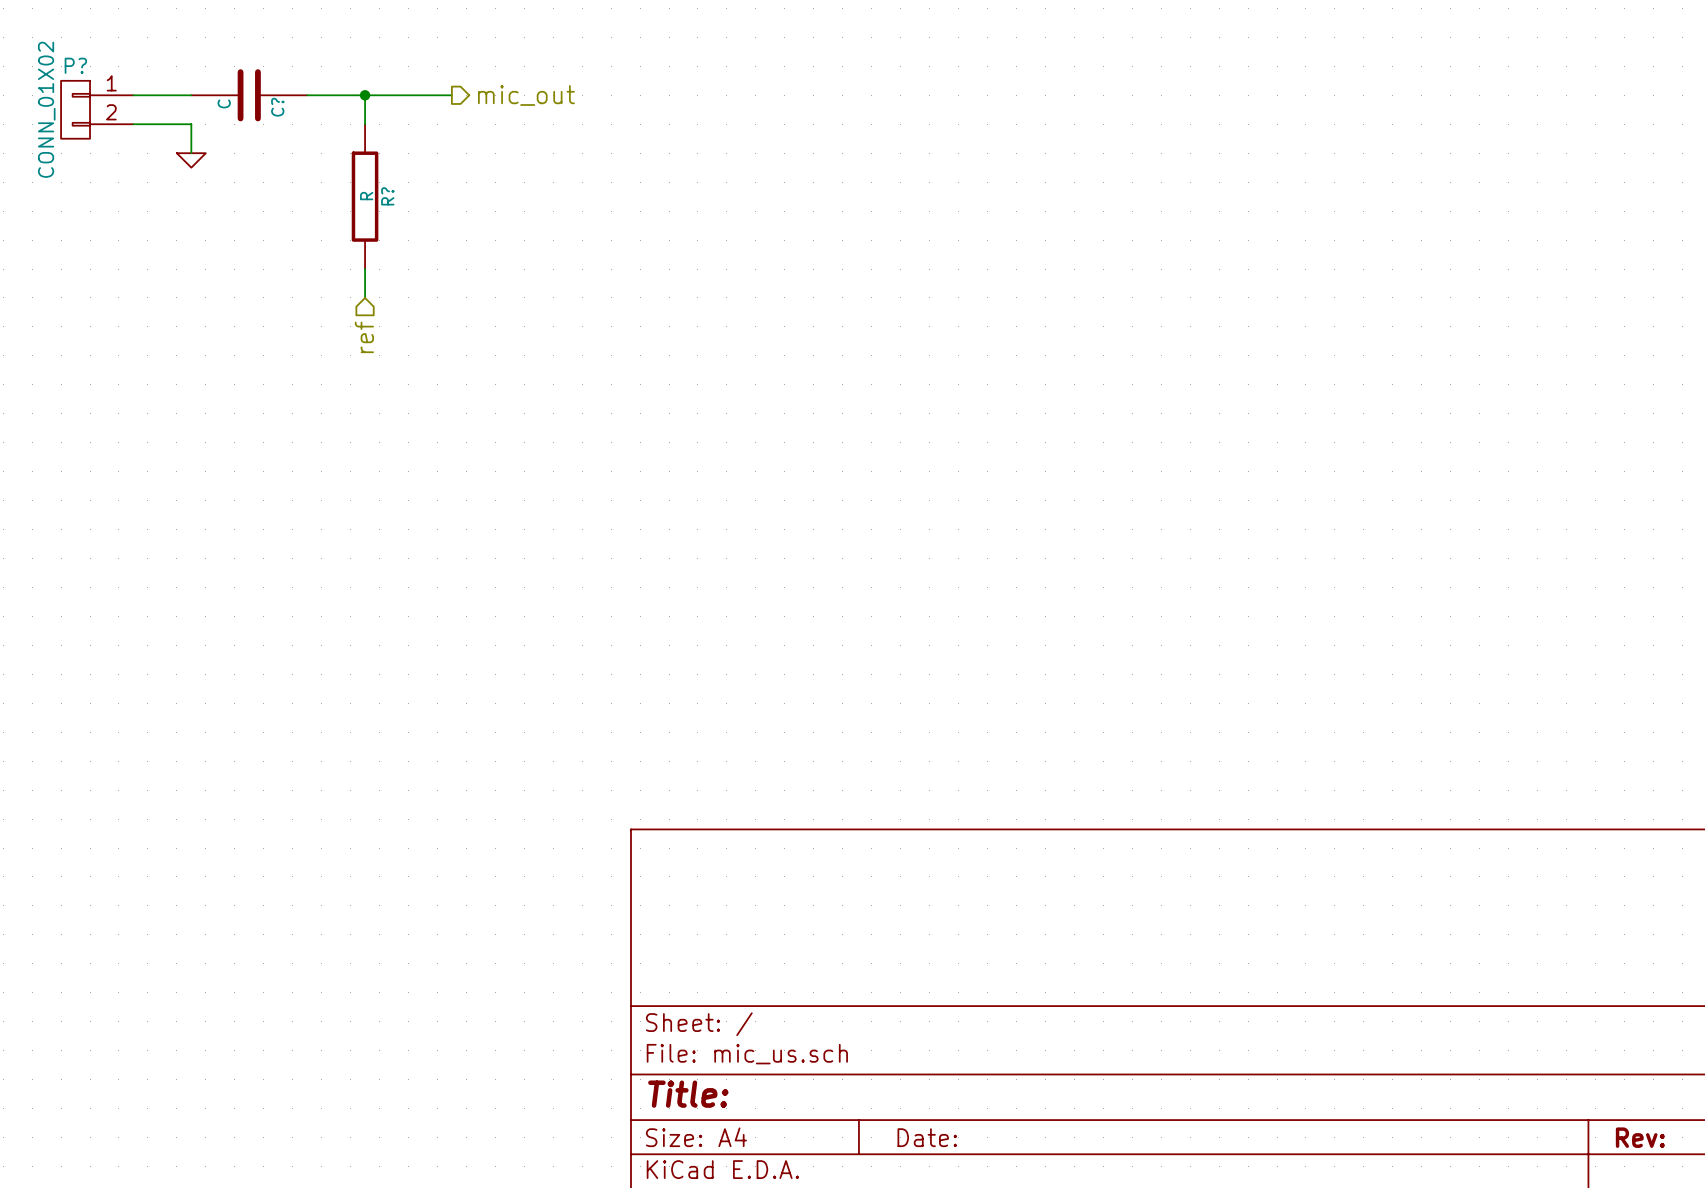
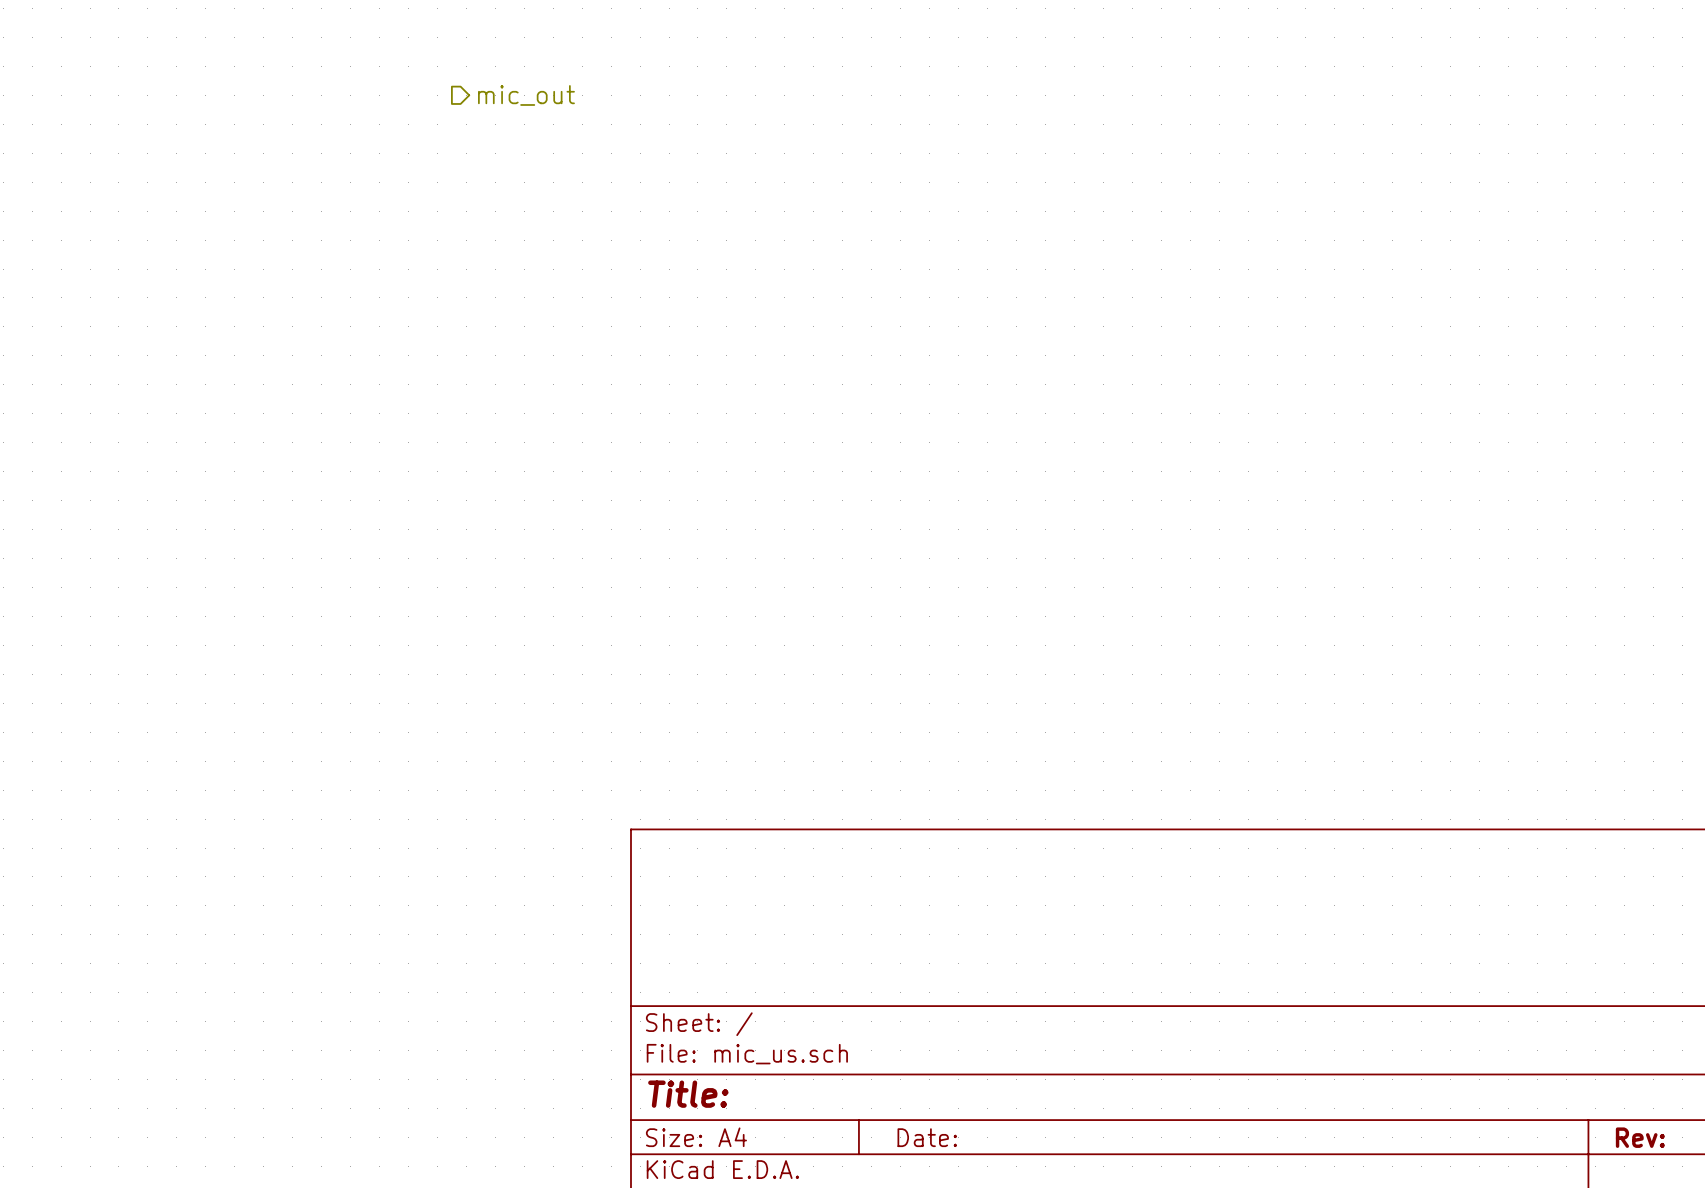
wire: (133, 95) (191, 95) -> none
C?: C (249, 95) -> none
wire: (307, 95) (451, 95) -> none
wire: (365, 95) (365, 124) -> none
junction: (365, 95) -> none
P?: CONN_01X02 (97, 109) -> none
wire: (133, 124) (191, 124) (191, 153) -> none
power symbol: (191, 160) -> none
R?: R (365, 196) -> none
wire: (365, 269) (365, 297) -> none
hierarchical label: ref (364, 337) -> none

